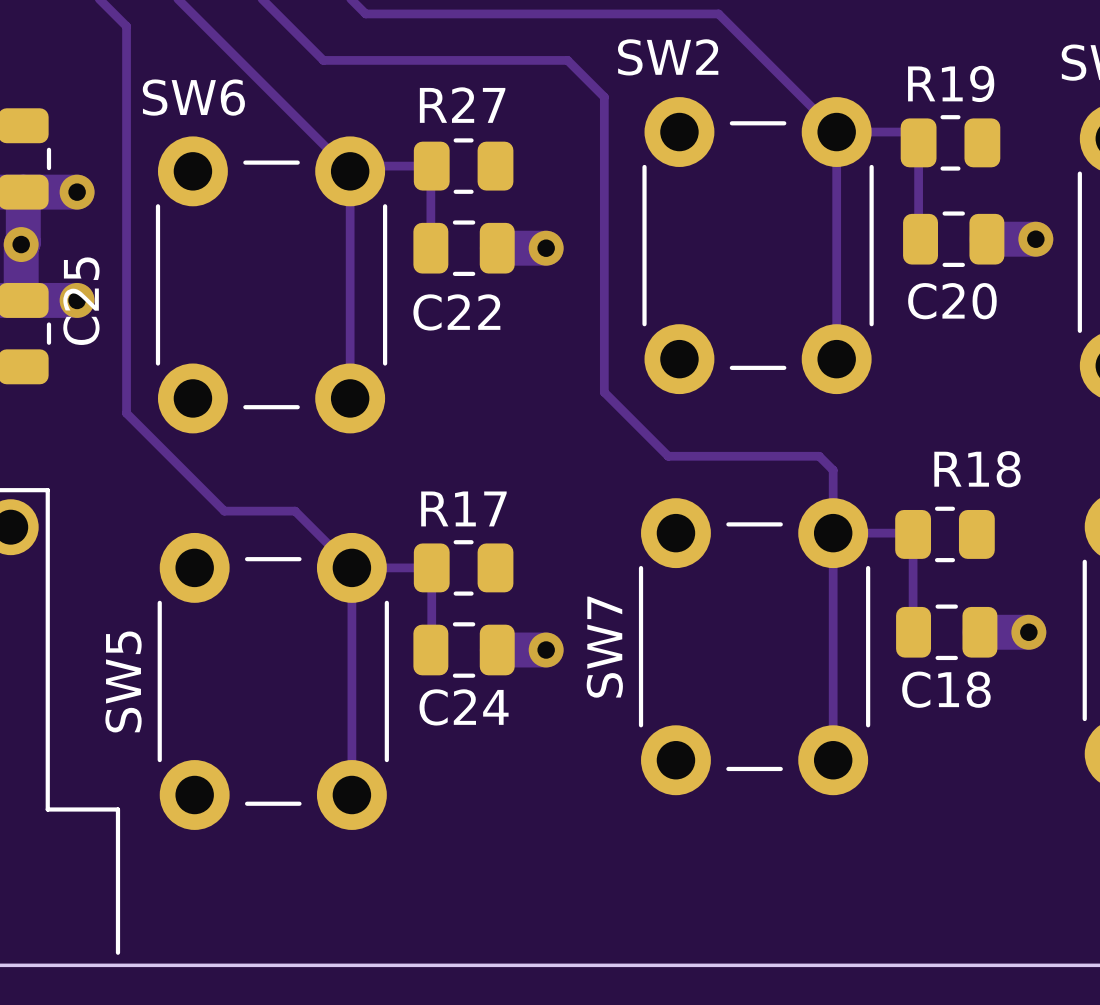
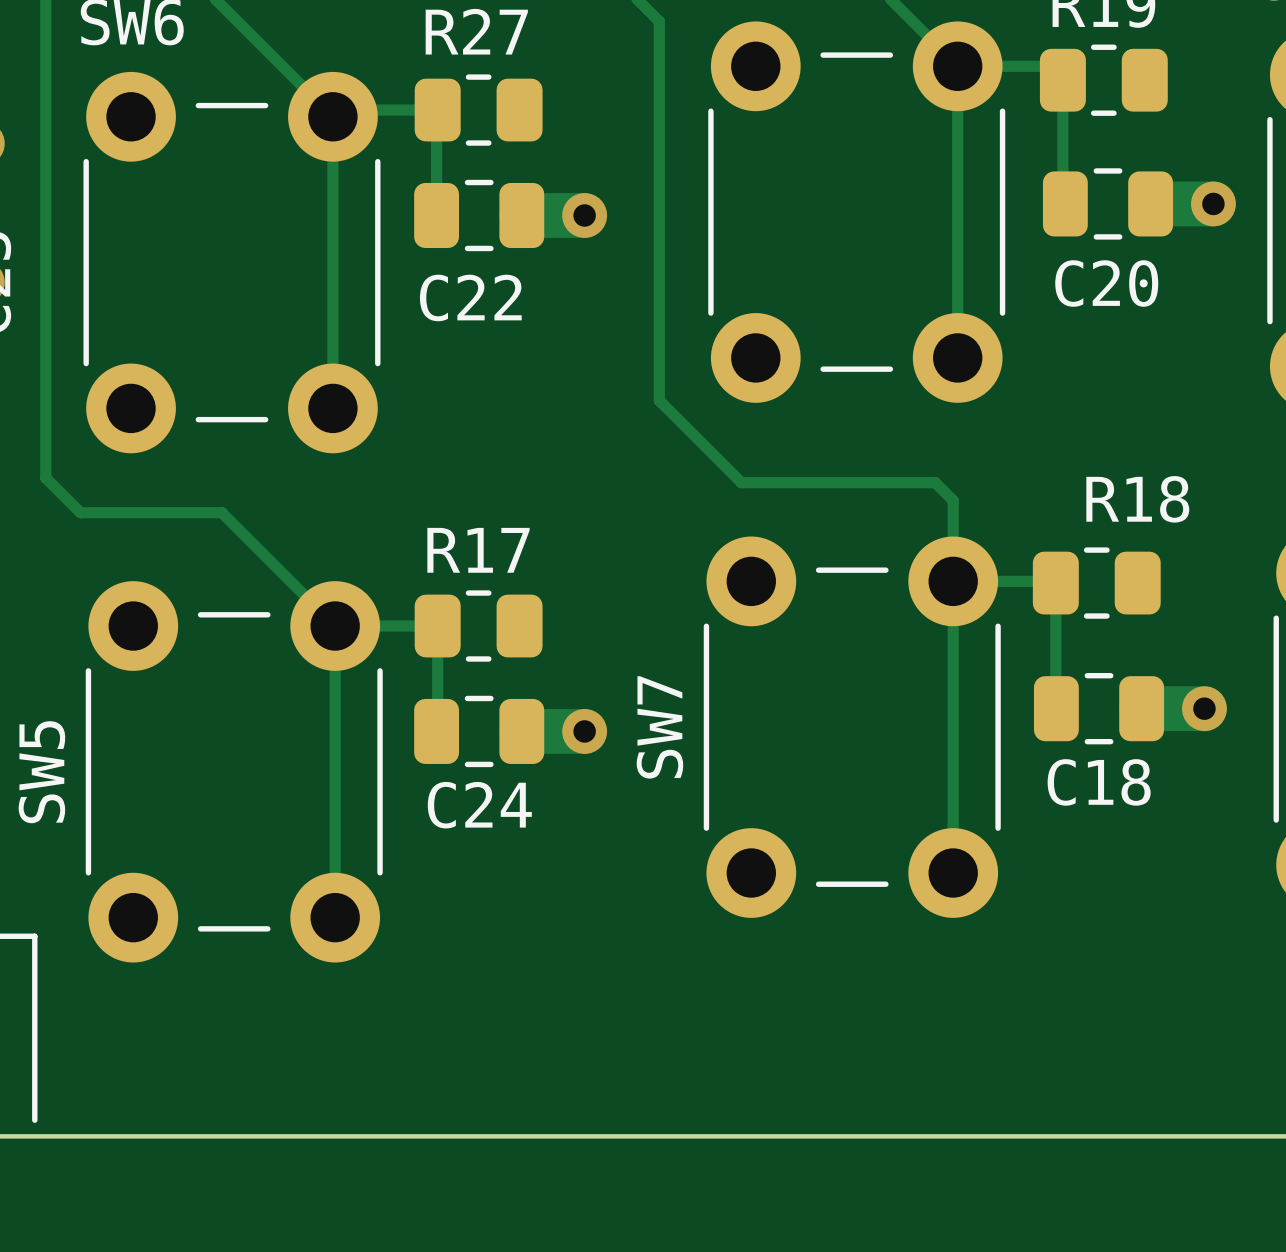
track: (126, 413) (224, 511) (295, 511) -> (45, 427) (45, 477) (80, 512) (221, 512) (262, 553)

